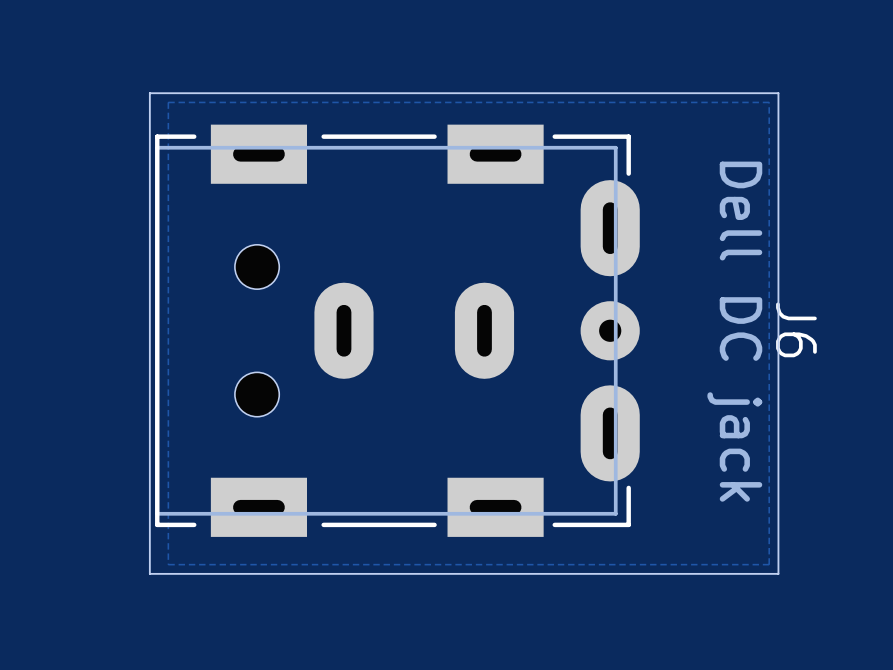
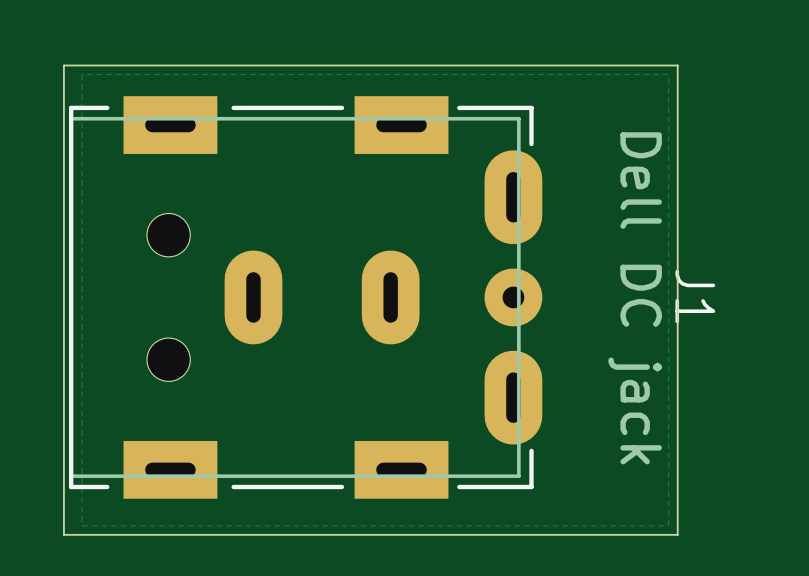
J6 name: J6 (796, 329) -> J1 (695, 296)

